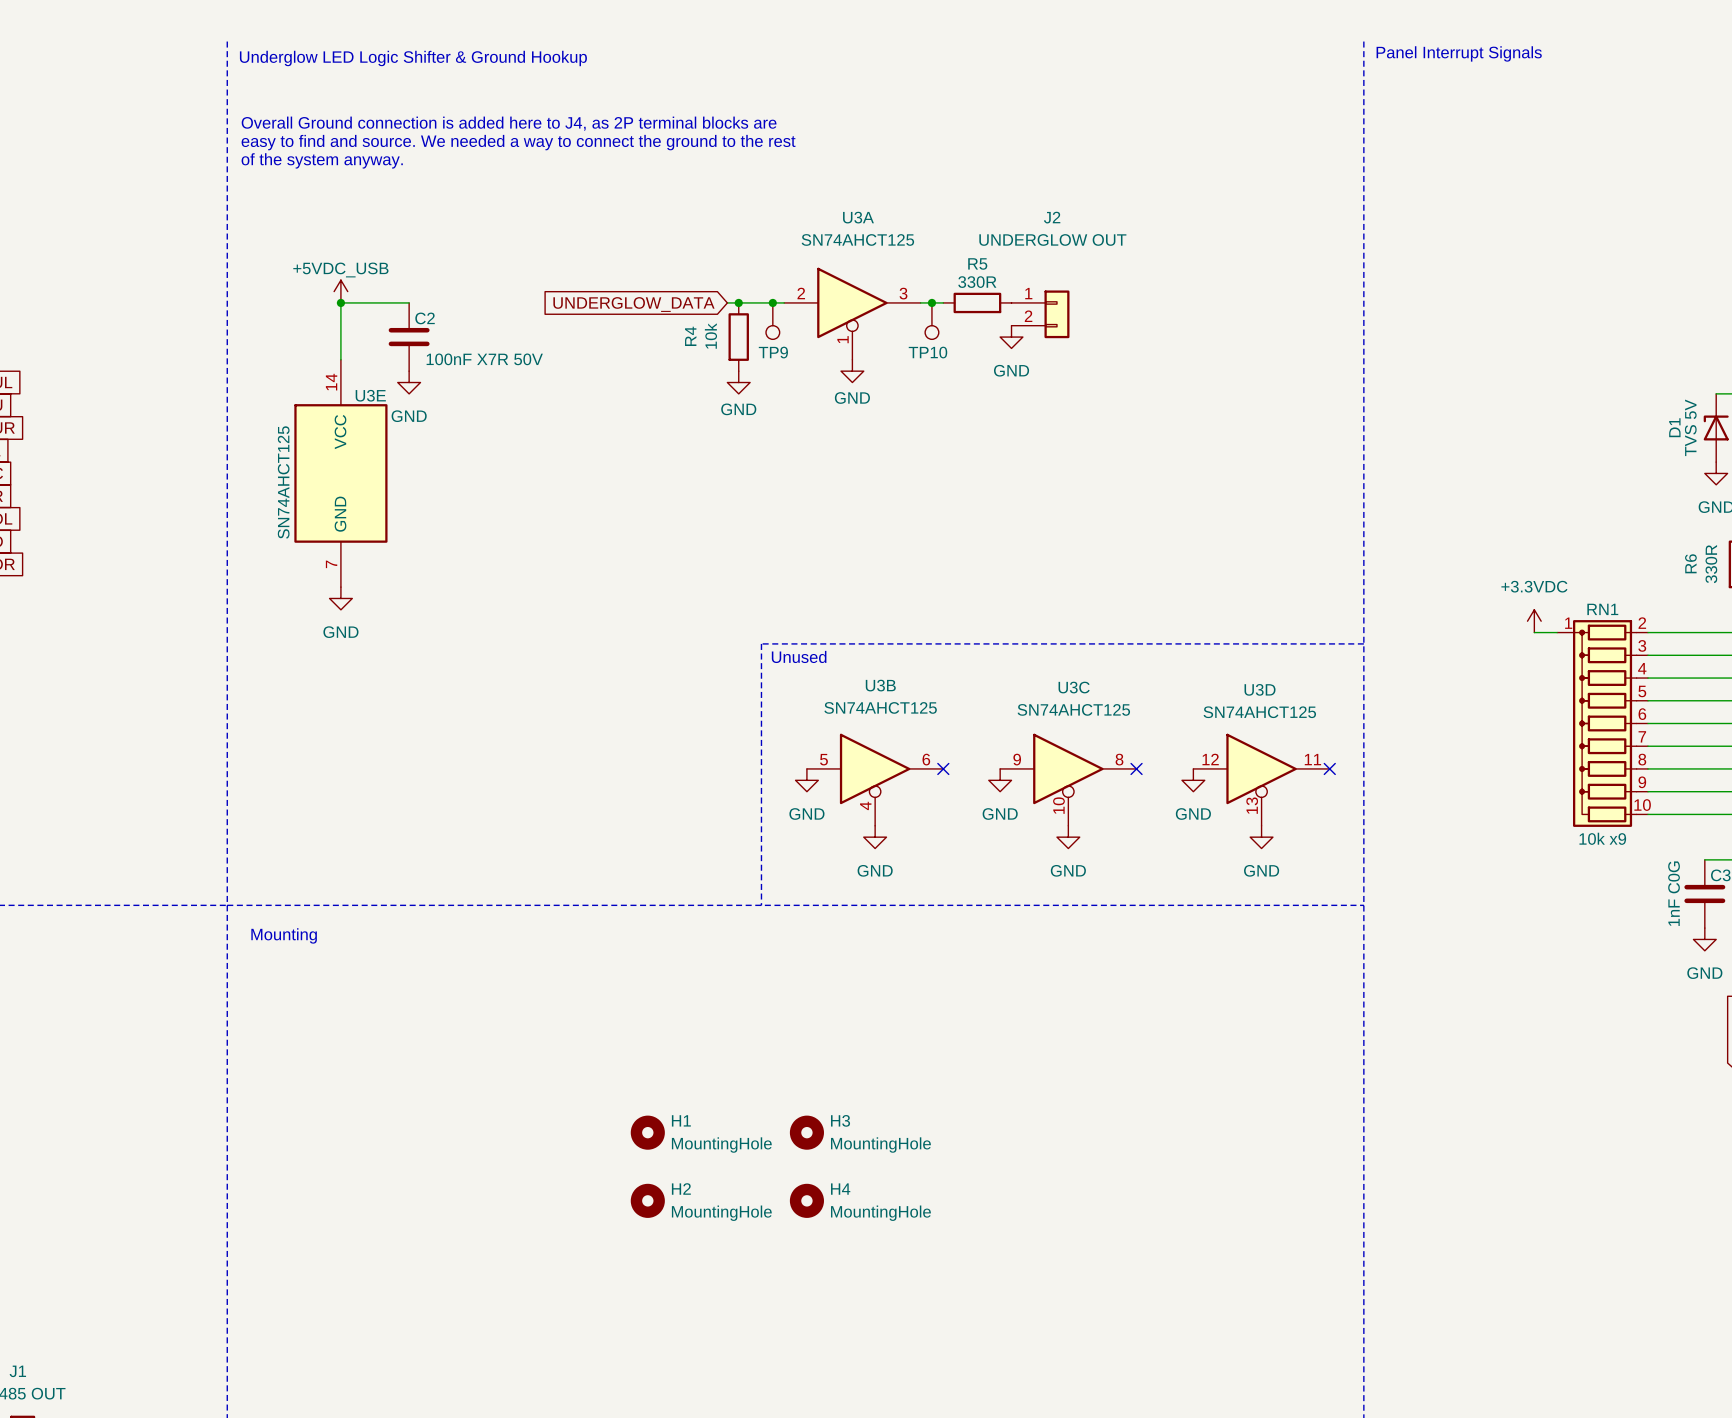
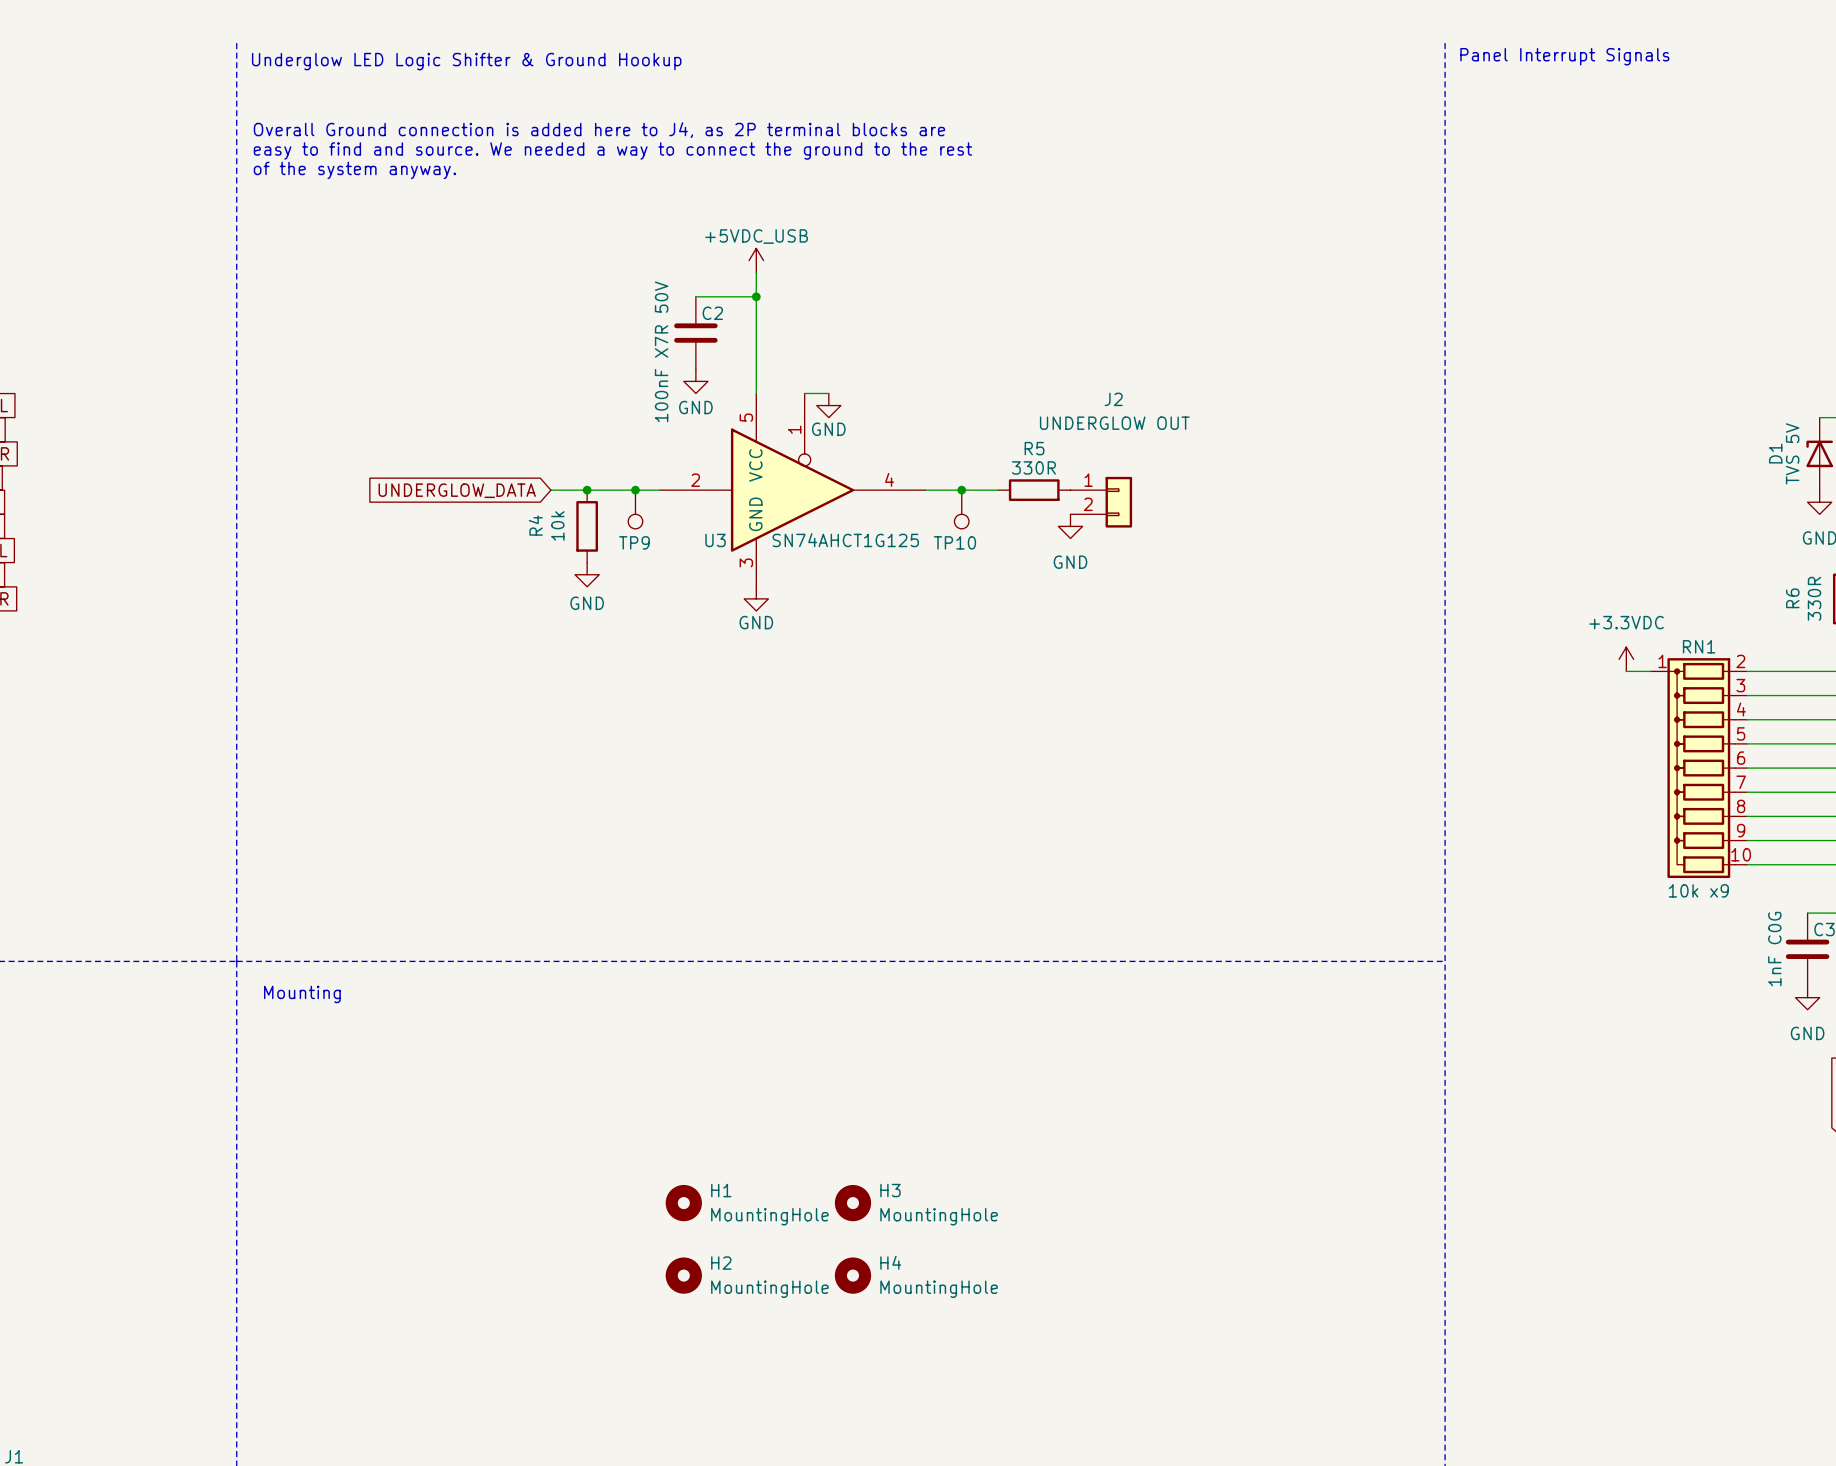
power symbol: none -> +5VDC_USB (756, 260)
wire: none -> (756, 272) (756, 393)
junction: none -> (756, 296)
power symbol: +5VDC_USB (340, 291) -> none
junction: (340, 302) -> none
wire: (409, 302) (340, 302) (340, 359) -> none
wire: (727, 302) (784, 302) -> (695, 296) (756, 296)
junction: (738, 302) -> none
junction: (772, 302) -> none
wire: (920, 302) (943, 302) -> (804, 393) (828, 393)
junction: (931, 302) -> none
R5 position: (977, 302) -> (1034, 490)
global label: UNDERGLOW_DATA (633, 304) -> none
U3A: SN74AHCT125 (852, 313) -> none
J2 position: (1040, 314) -> (1101, 502)
TP9 position: (772, 321) -> (635, 509)
TP10 position: (931, 321) -> (961, 509)
C2 position: (409, 337) -> (695, 333)
R4 position: (738, 337) -> (587, 526)
power symbol: GND (1011, 337) -> none
C2 value rotation: 0° (484, 359) -> 90° counterclockwise (661, 351)
power symbol: none -> GND (695, 381)
power symbol: GND (852, 371) -> none
power symbol: GND (409, 382) -> none
power symbol: GND (738, 382) -> none
power symbol: none -> GND (828, 405)
wire: none -> (550, 490) (659, 490)
junction: none -> (587, 490)
junction: none -> (635, 490)
U3: none -> SN74AHCT1G125 (792, 490)
wire: none -> (925, 490) (997, 490)
junction: none -> (961, 490)
global label: none -> UNDERGLOW_DATA (457, 490)
U3E: SN74AHCT125 (340, 473) -> none
power symbol: none -> GND (1070, 526)
power symbol: none -> GND (587, 574)
power symbol: none -> GND (756, 598)
power symbol: GND (340, 598) -> none
line: (1363, 643) (761, 643) (761, 905) -> none
text: Unused (799, 656) -> none
no-connect mark: (943, 768) -> none
no-connect mark: (1136, 768) -> none
no-connect mark: (1329, 768) -> none
U3B: SN74AHCT125 (875, 779) -> none
U3C: SN74AHCT125 (1068, 779) -> none
U3D: SN74AHCT125 (1261, 779) -> none
power symbol: GND (806, 780) -> none
power symbol: GND (1000, 780) -> none
power symbol: GND (1193, 780) -> none
power symbol: GND (875, 837) -> none
power symbol: GND (1068, 837) -> none
power symbol: GND (1261, 837) -> none

